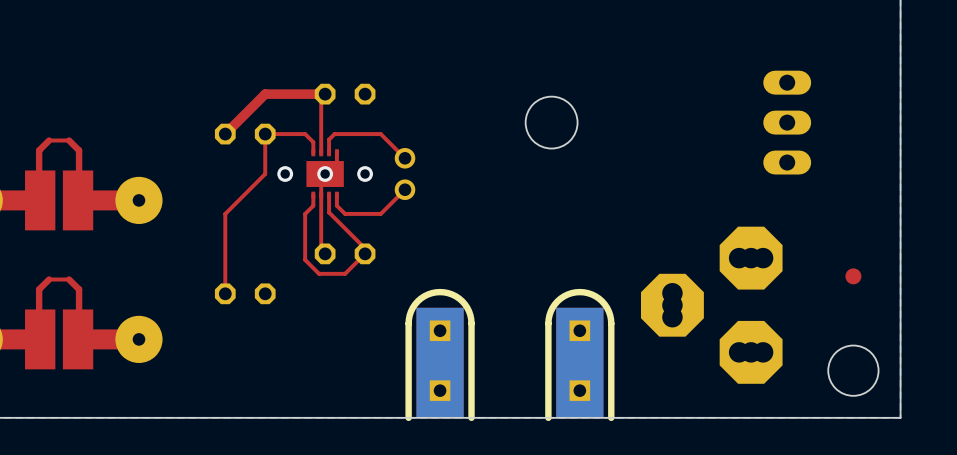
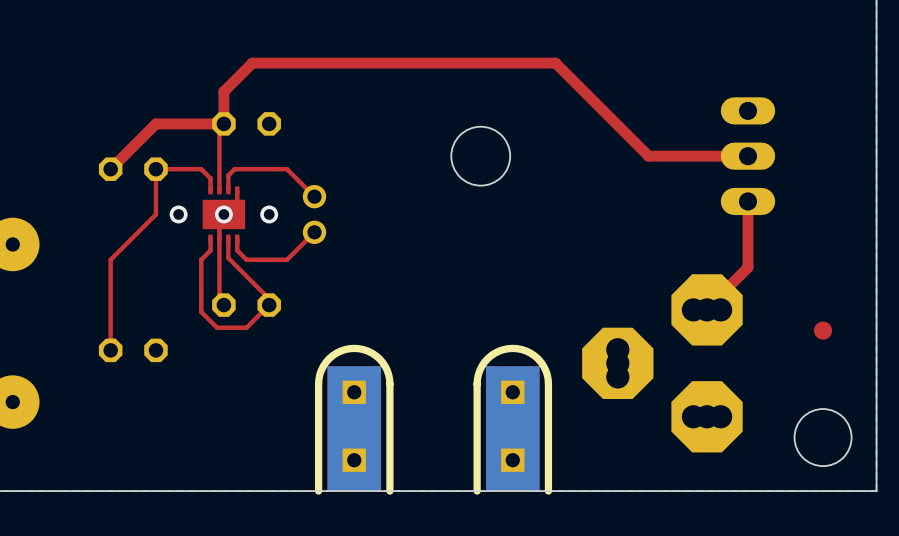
top track: none -> (223, 123) (223, 91) (252, 63) (555, 63) (648, 156) (747, 156)
top track: none -> (747, 201) (747, 267) (707, 308)

